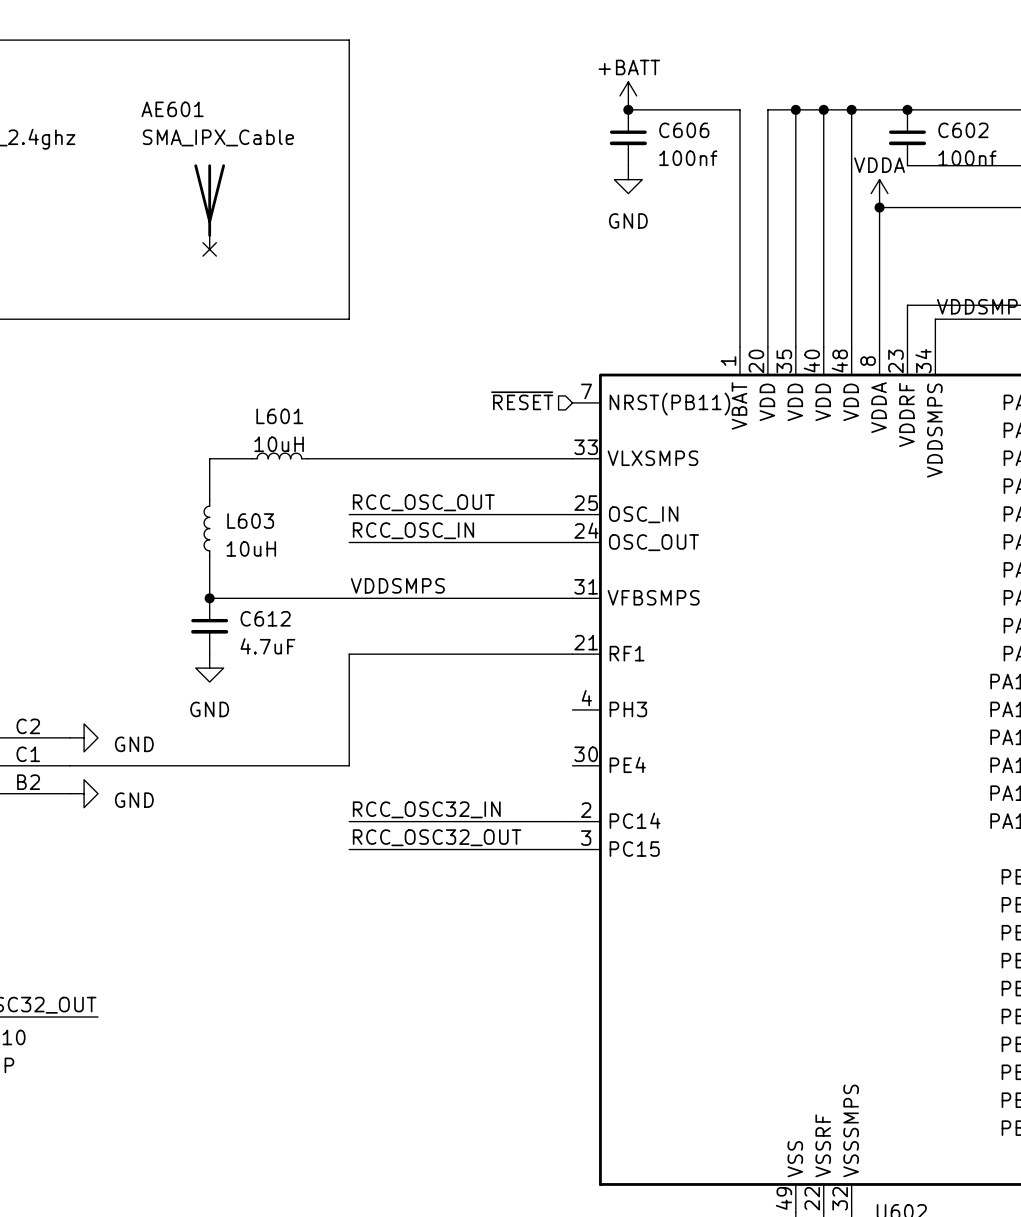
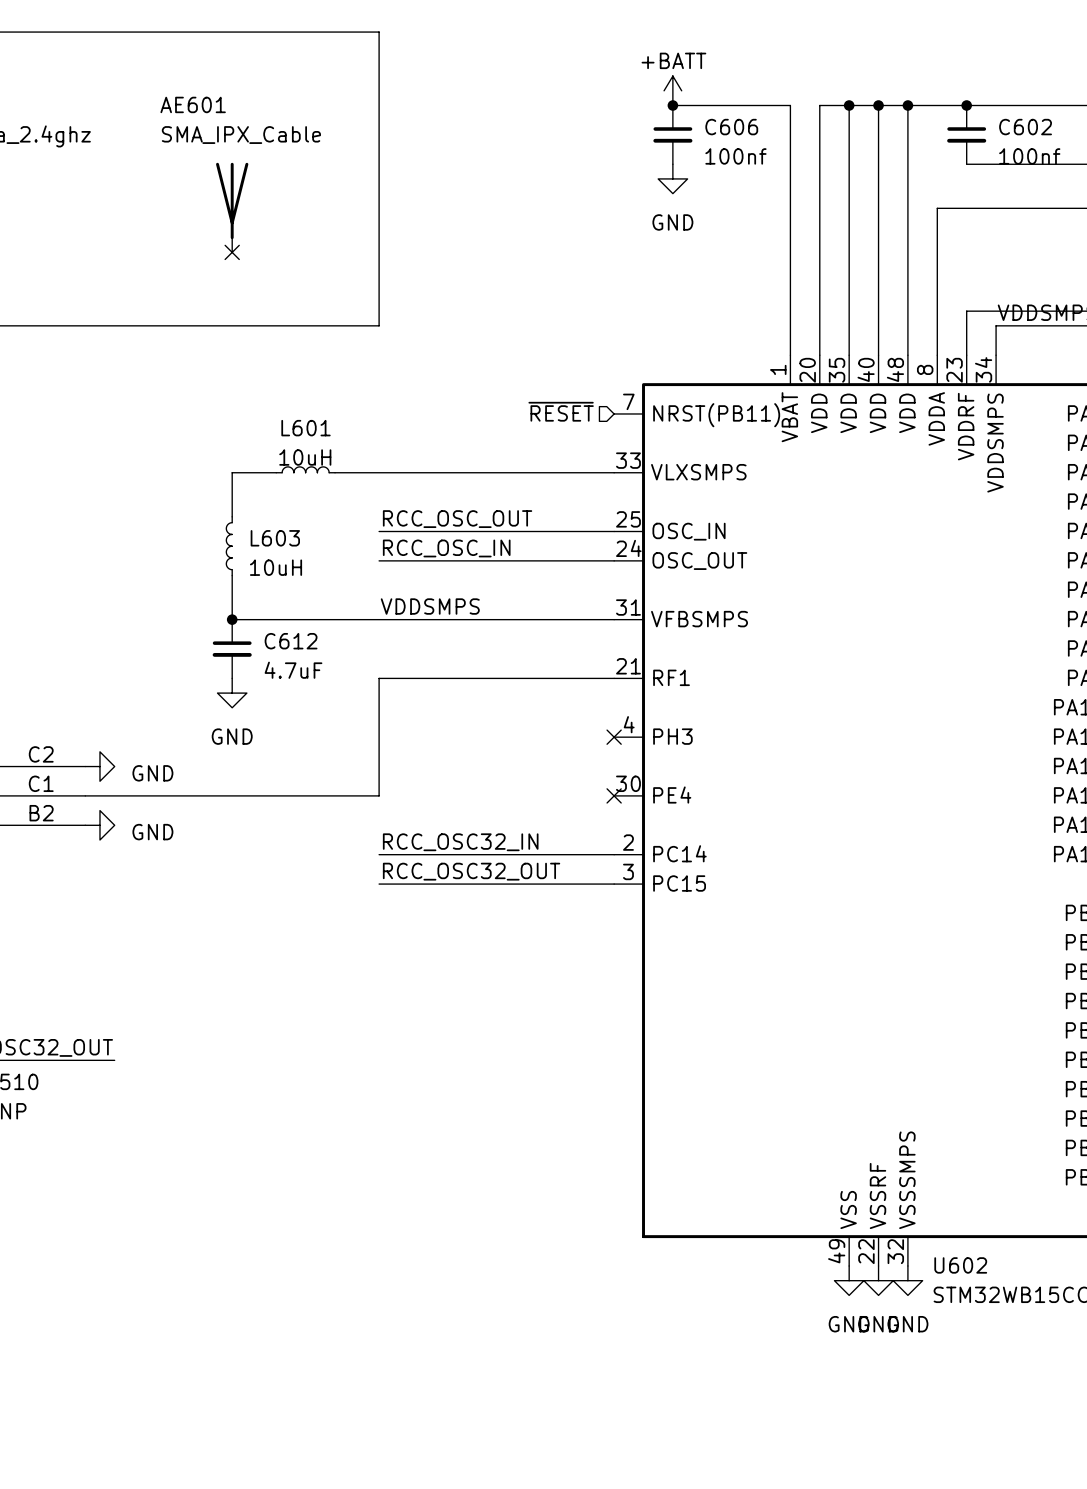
power symbol: VDDA (879, 193) -> none
junction: (879, 207) -> none
no-connect mark: none -> (614, 737)
no-connect mark: none -> (614, 795)

